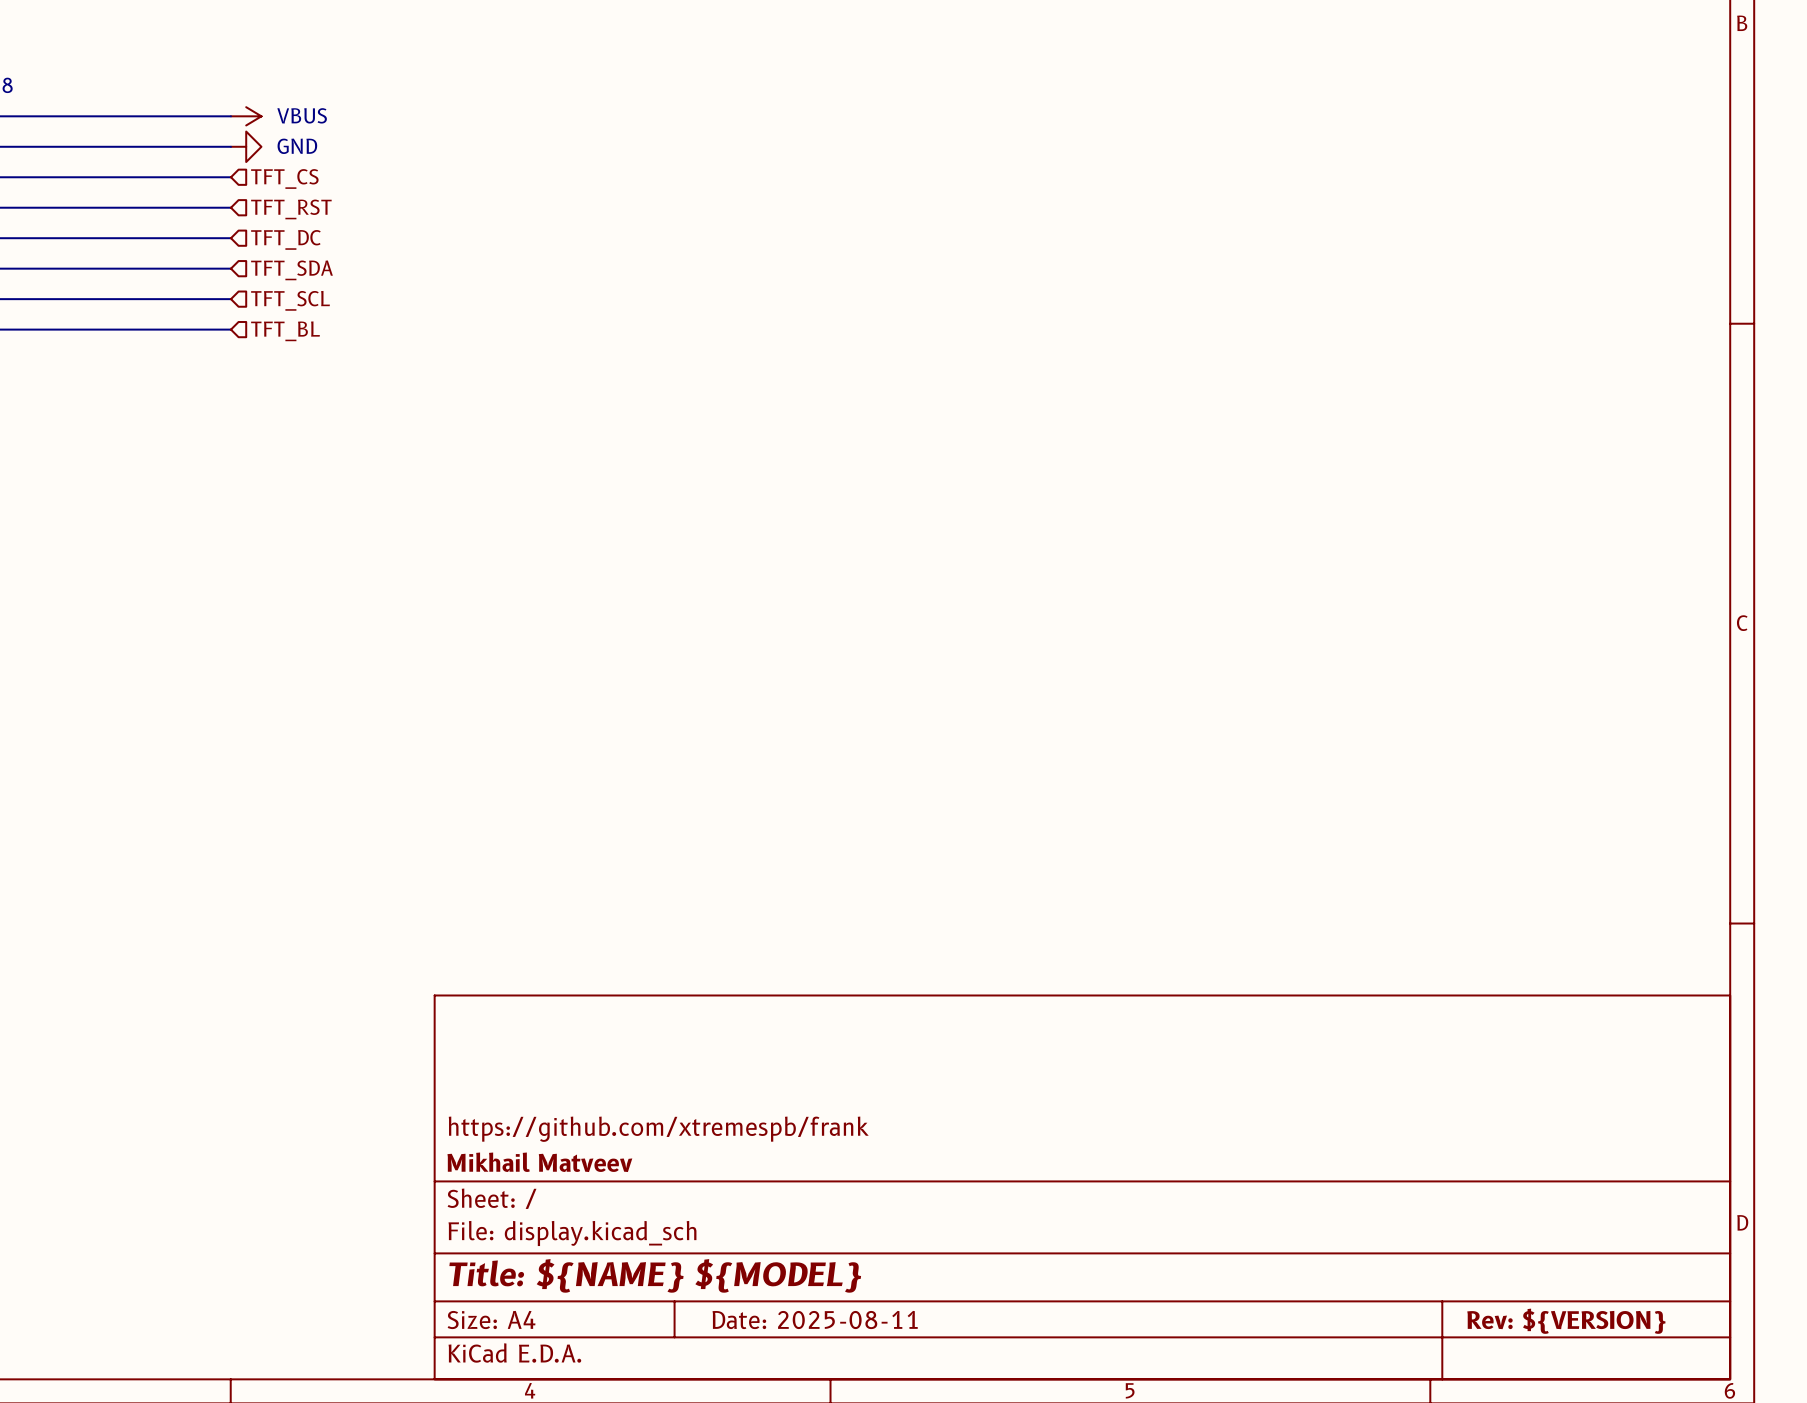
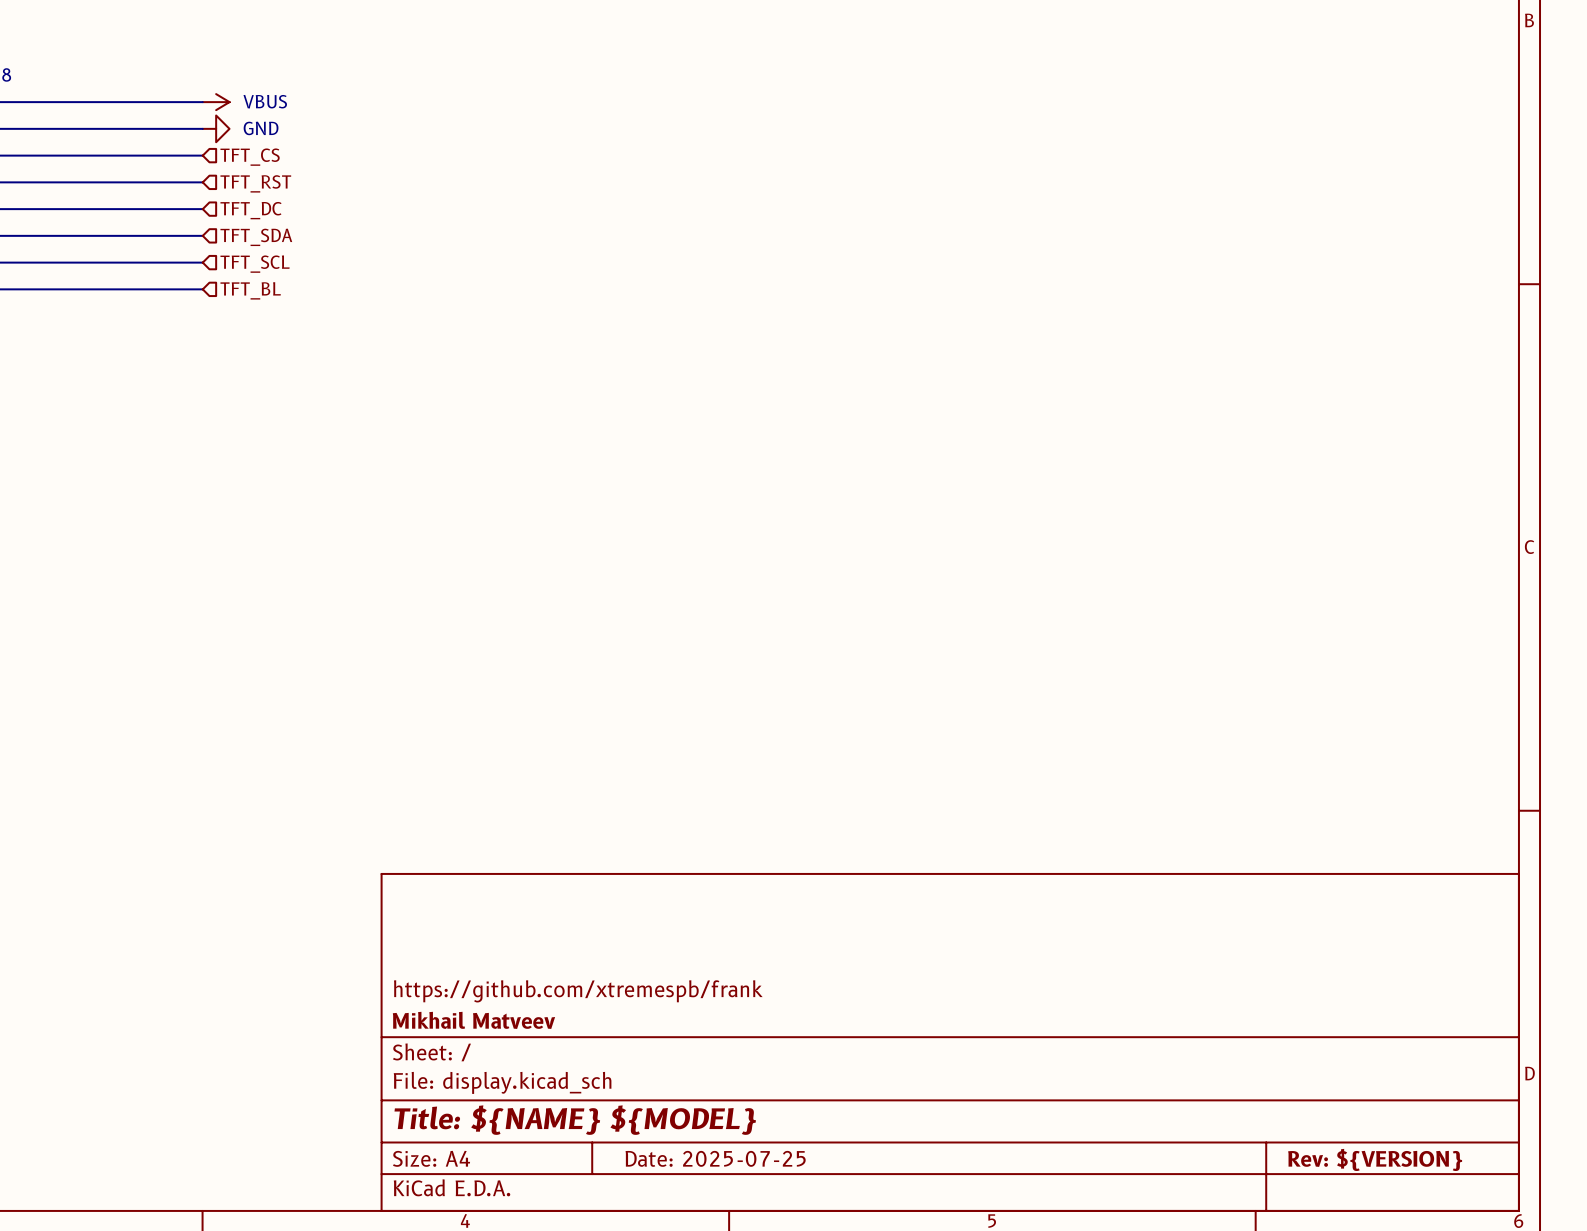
title block: Date: 2025-08-11 (815, 1319) -> Date: 2025-07-25 (715, 1158)

